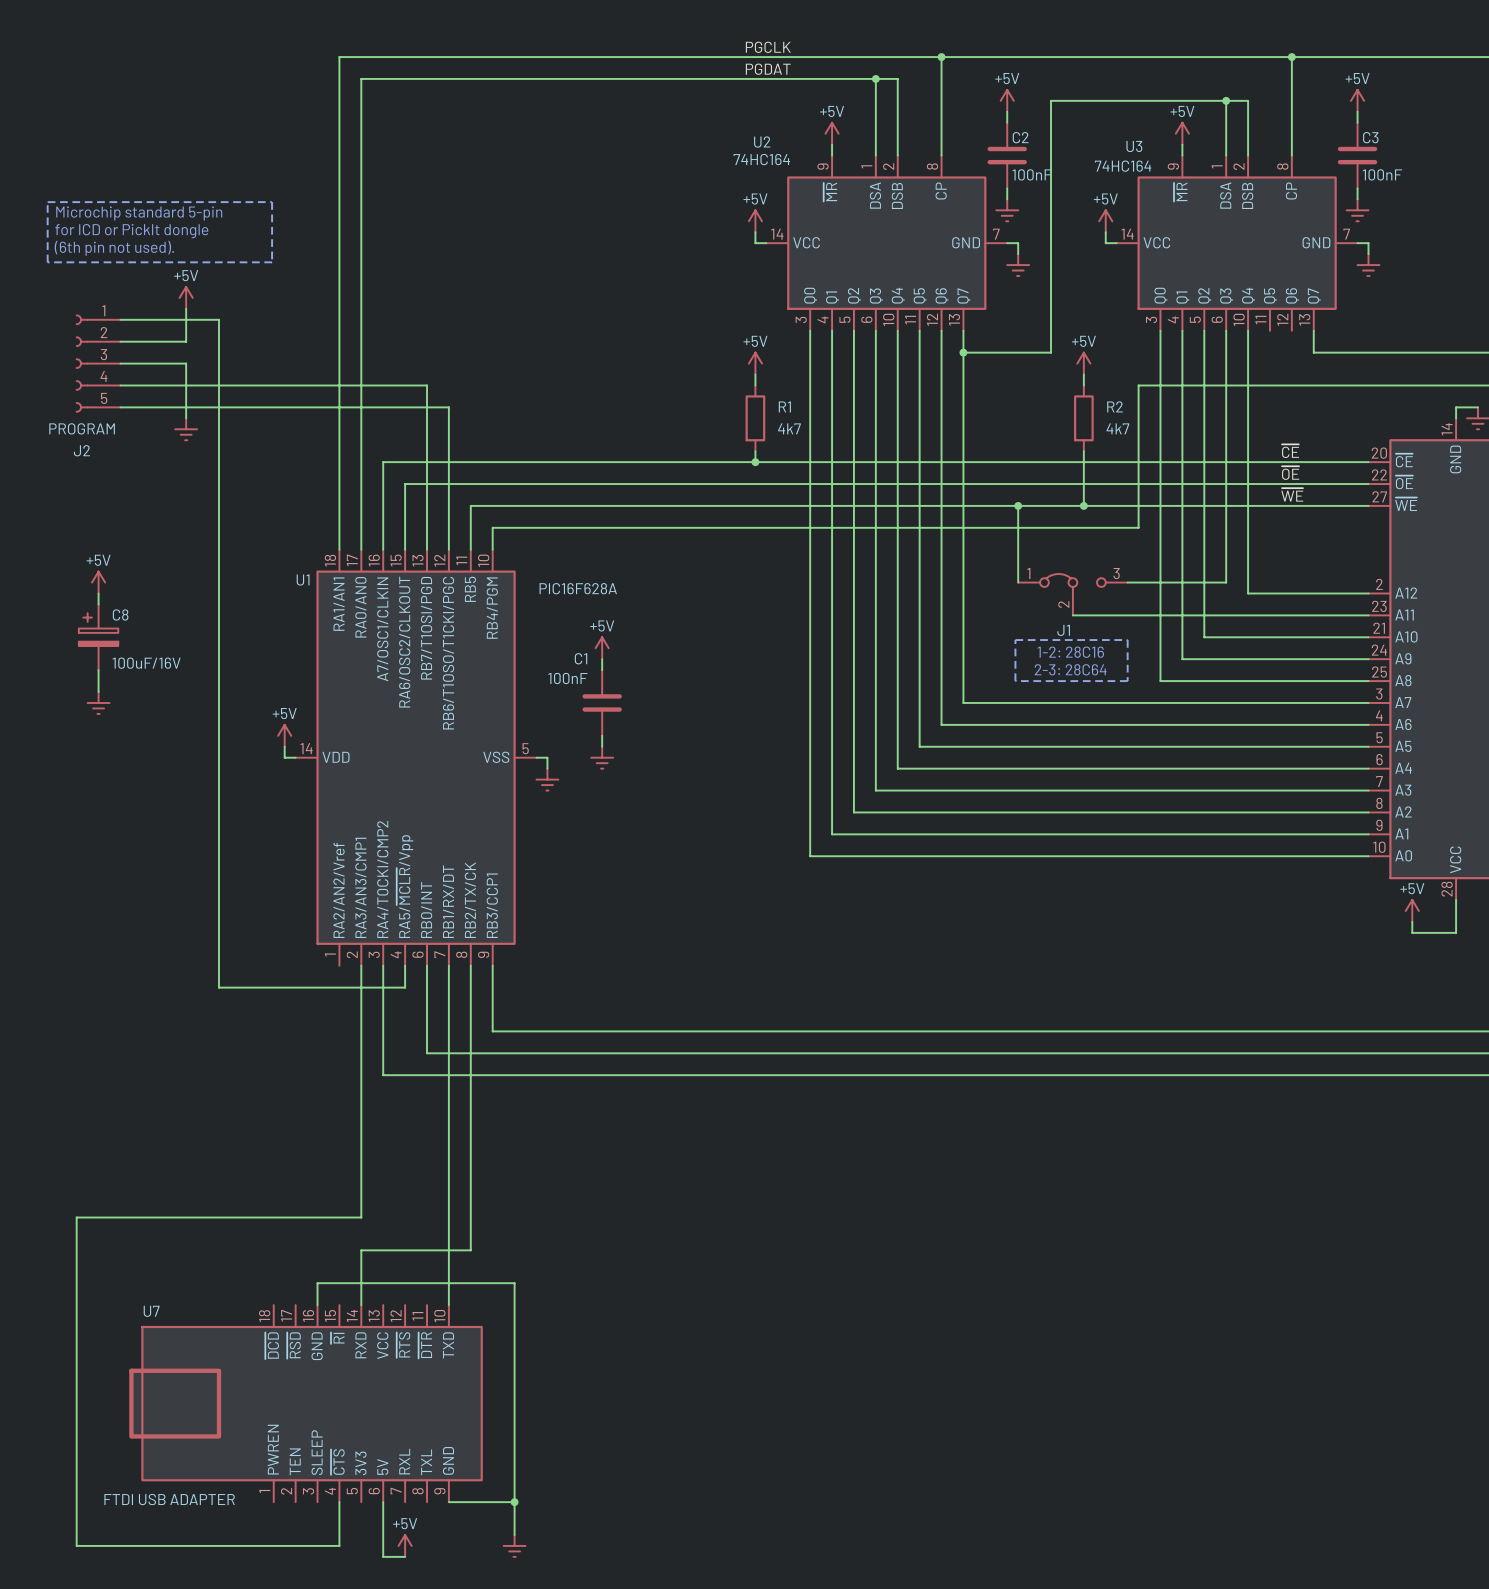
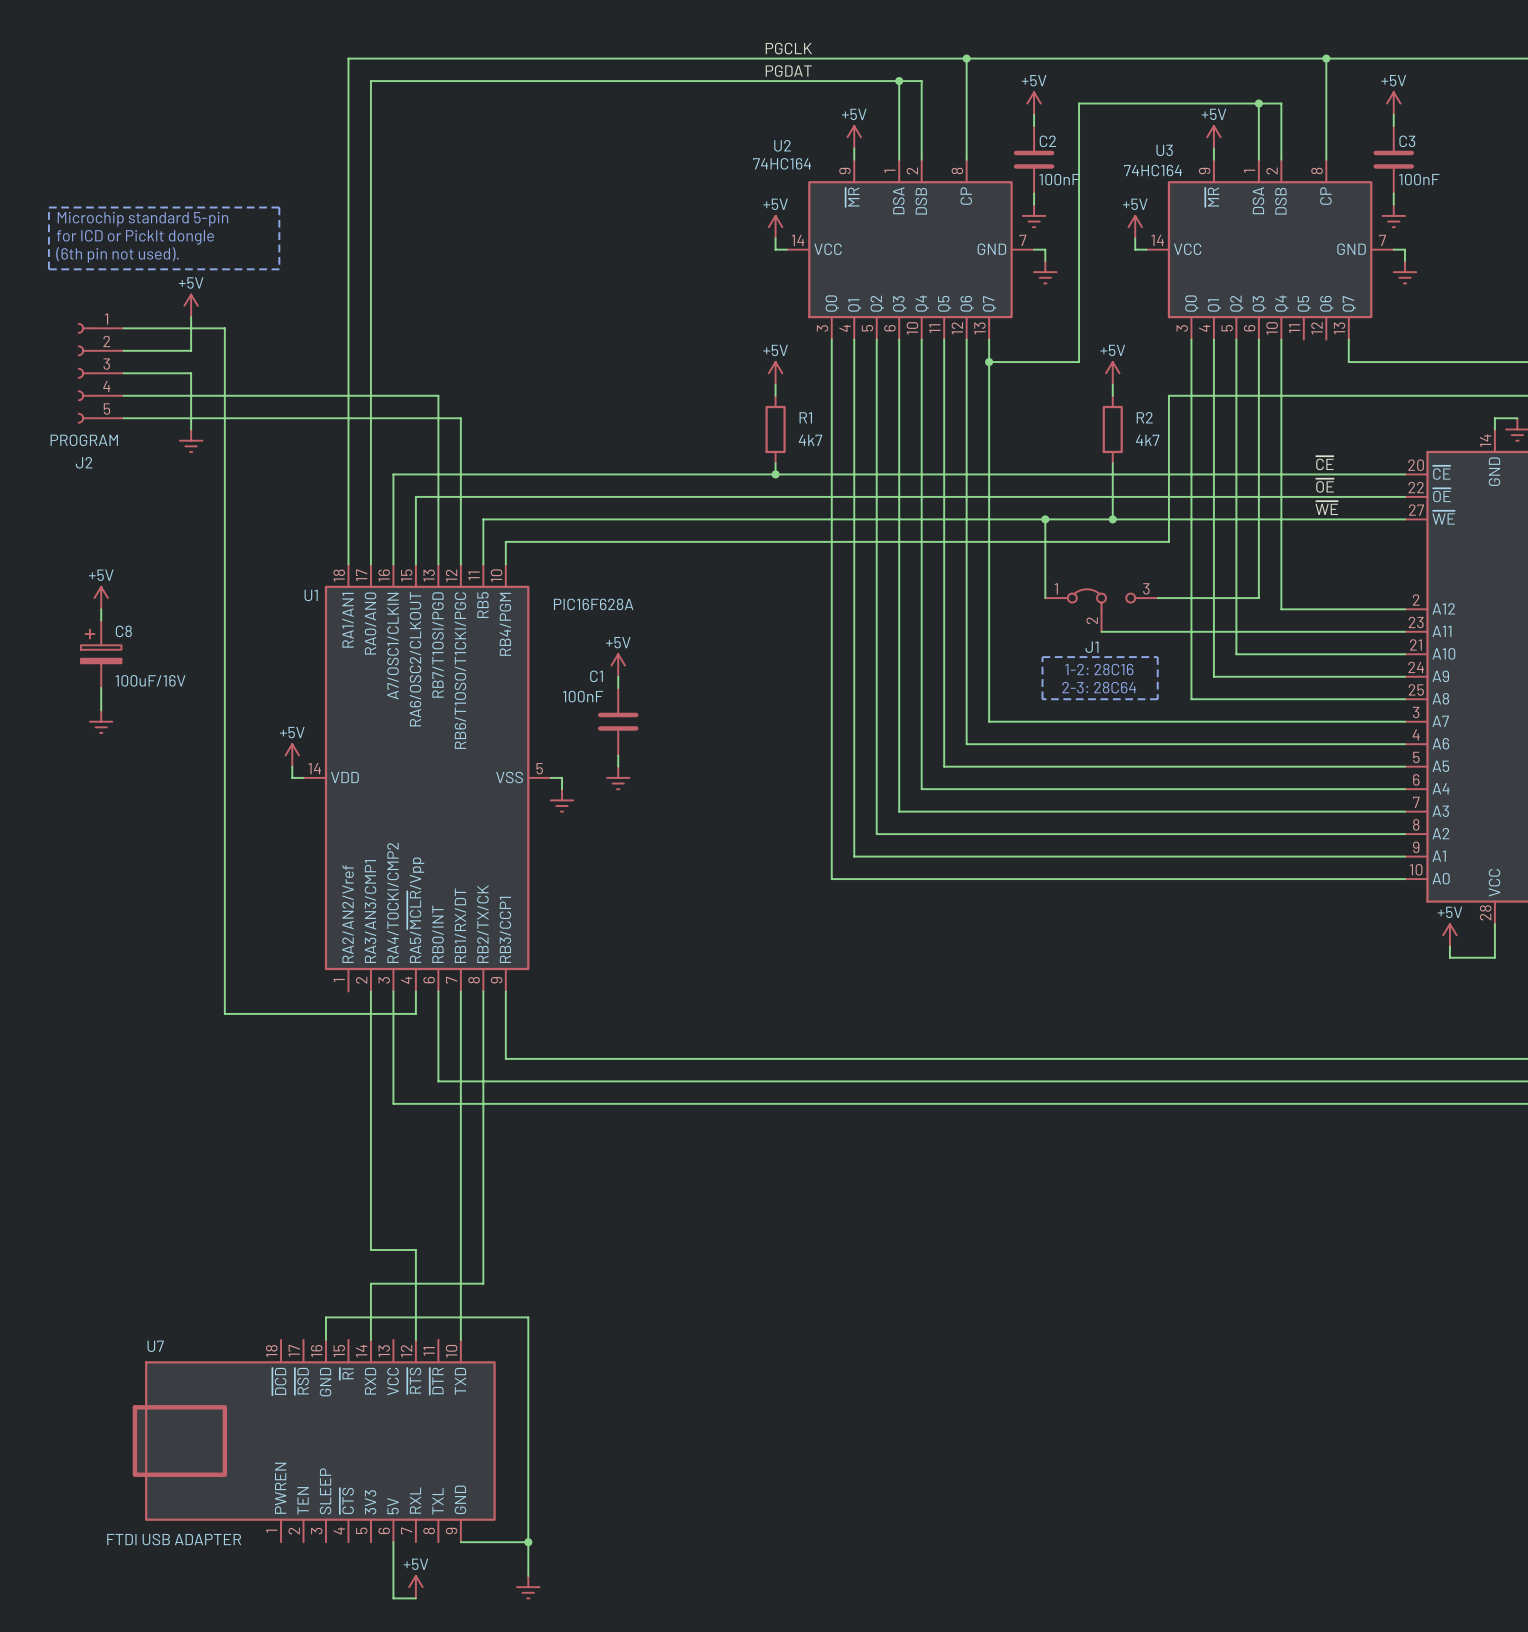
wire: (361, 1217) (76, 1217) (76, 1545) (339, 1545) (339, 1502) -> (370, 1249) (415, 1249) (415, 1339)

